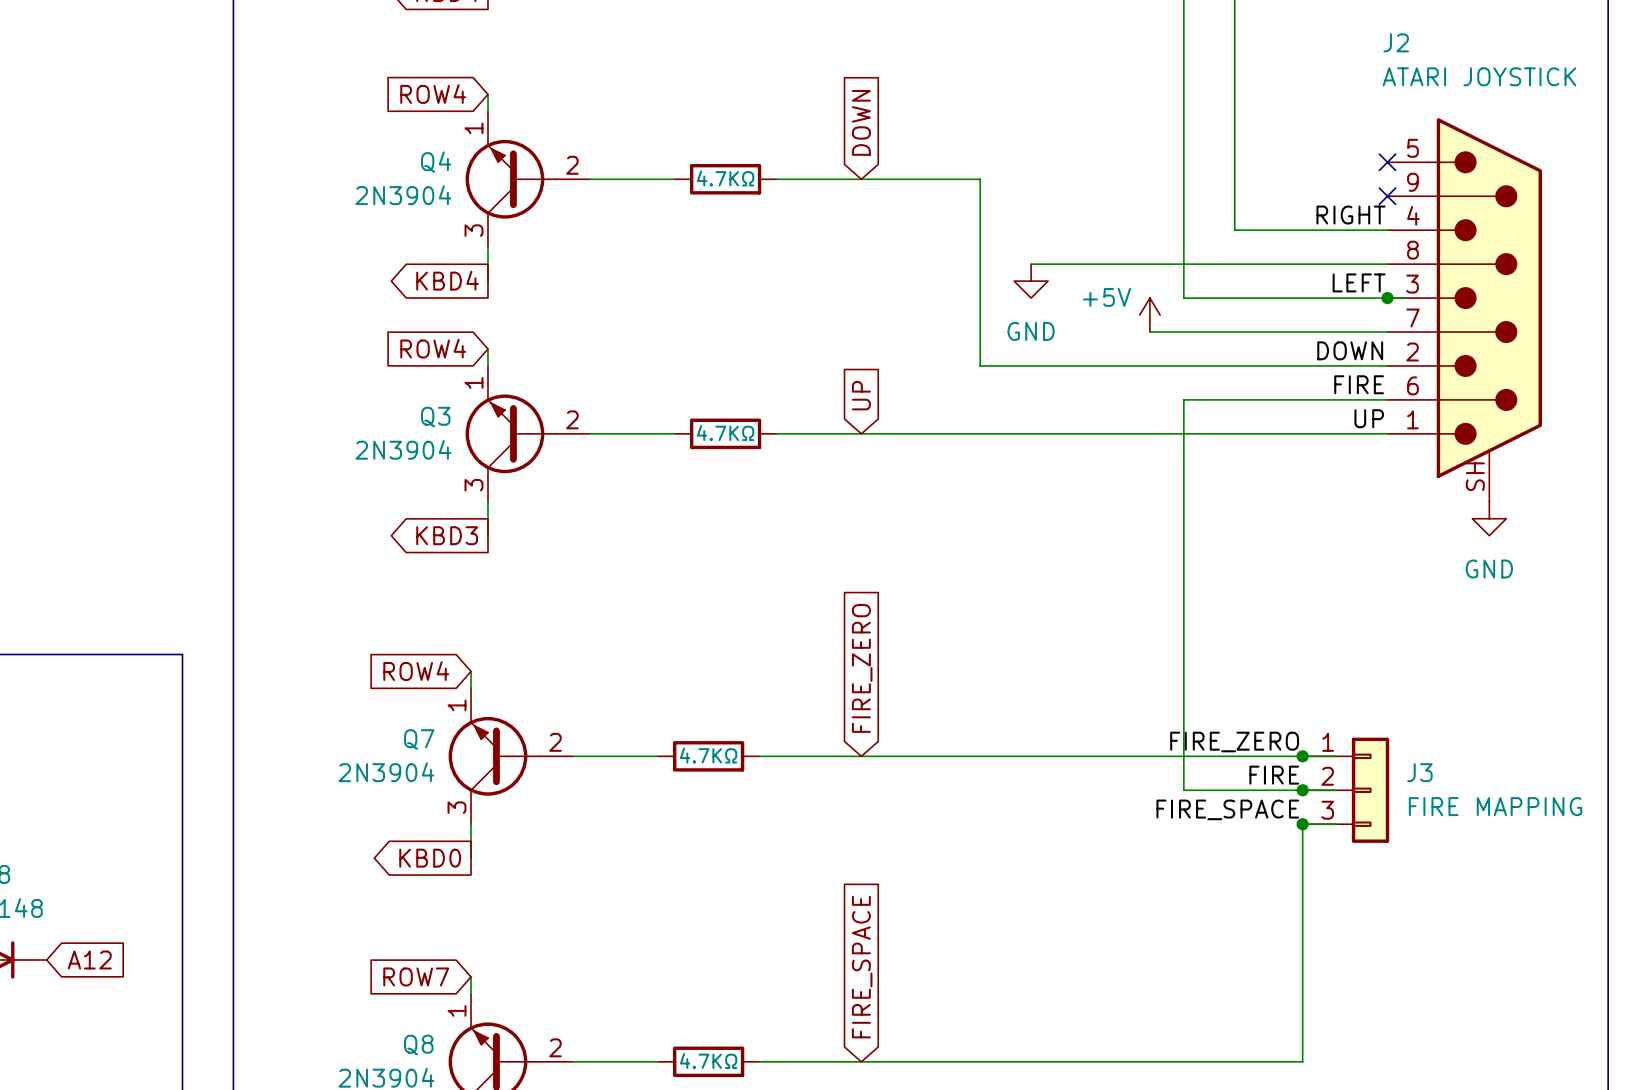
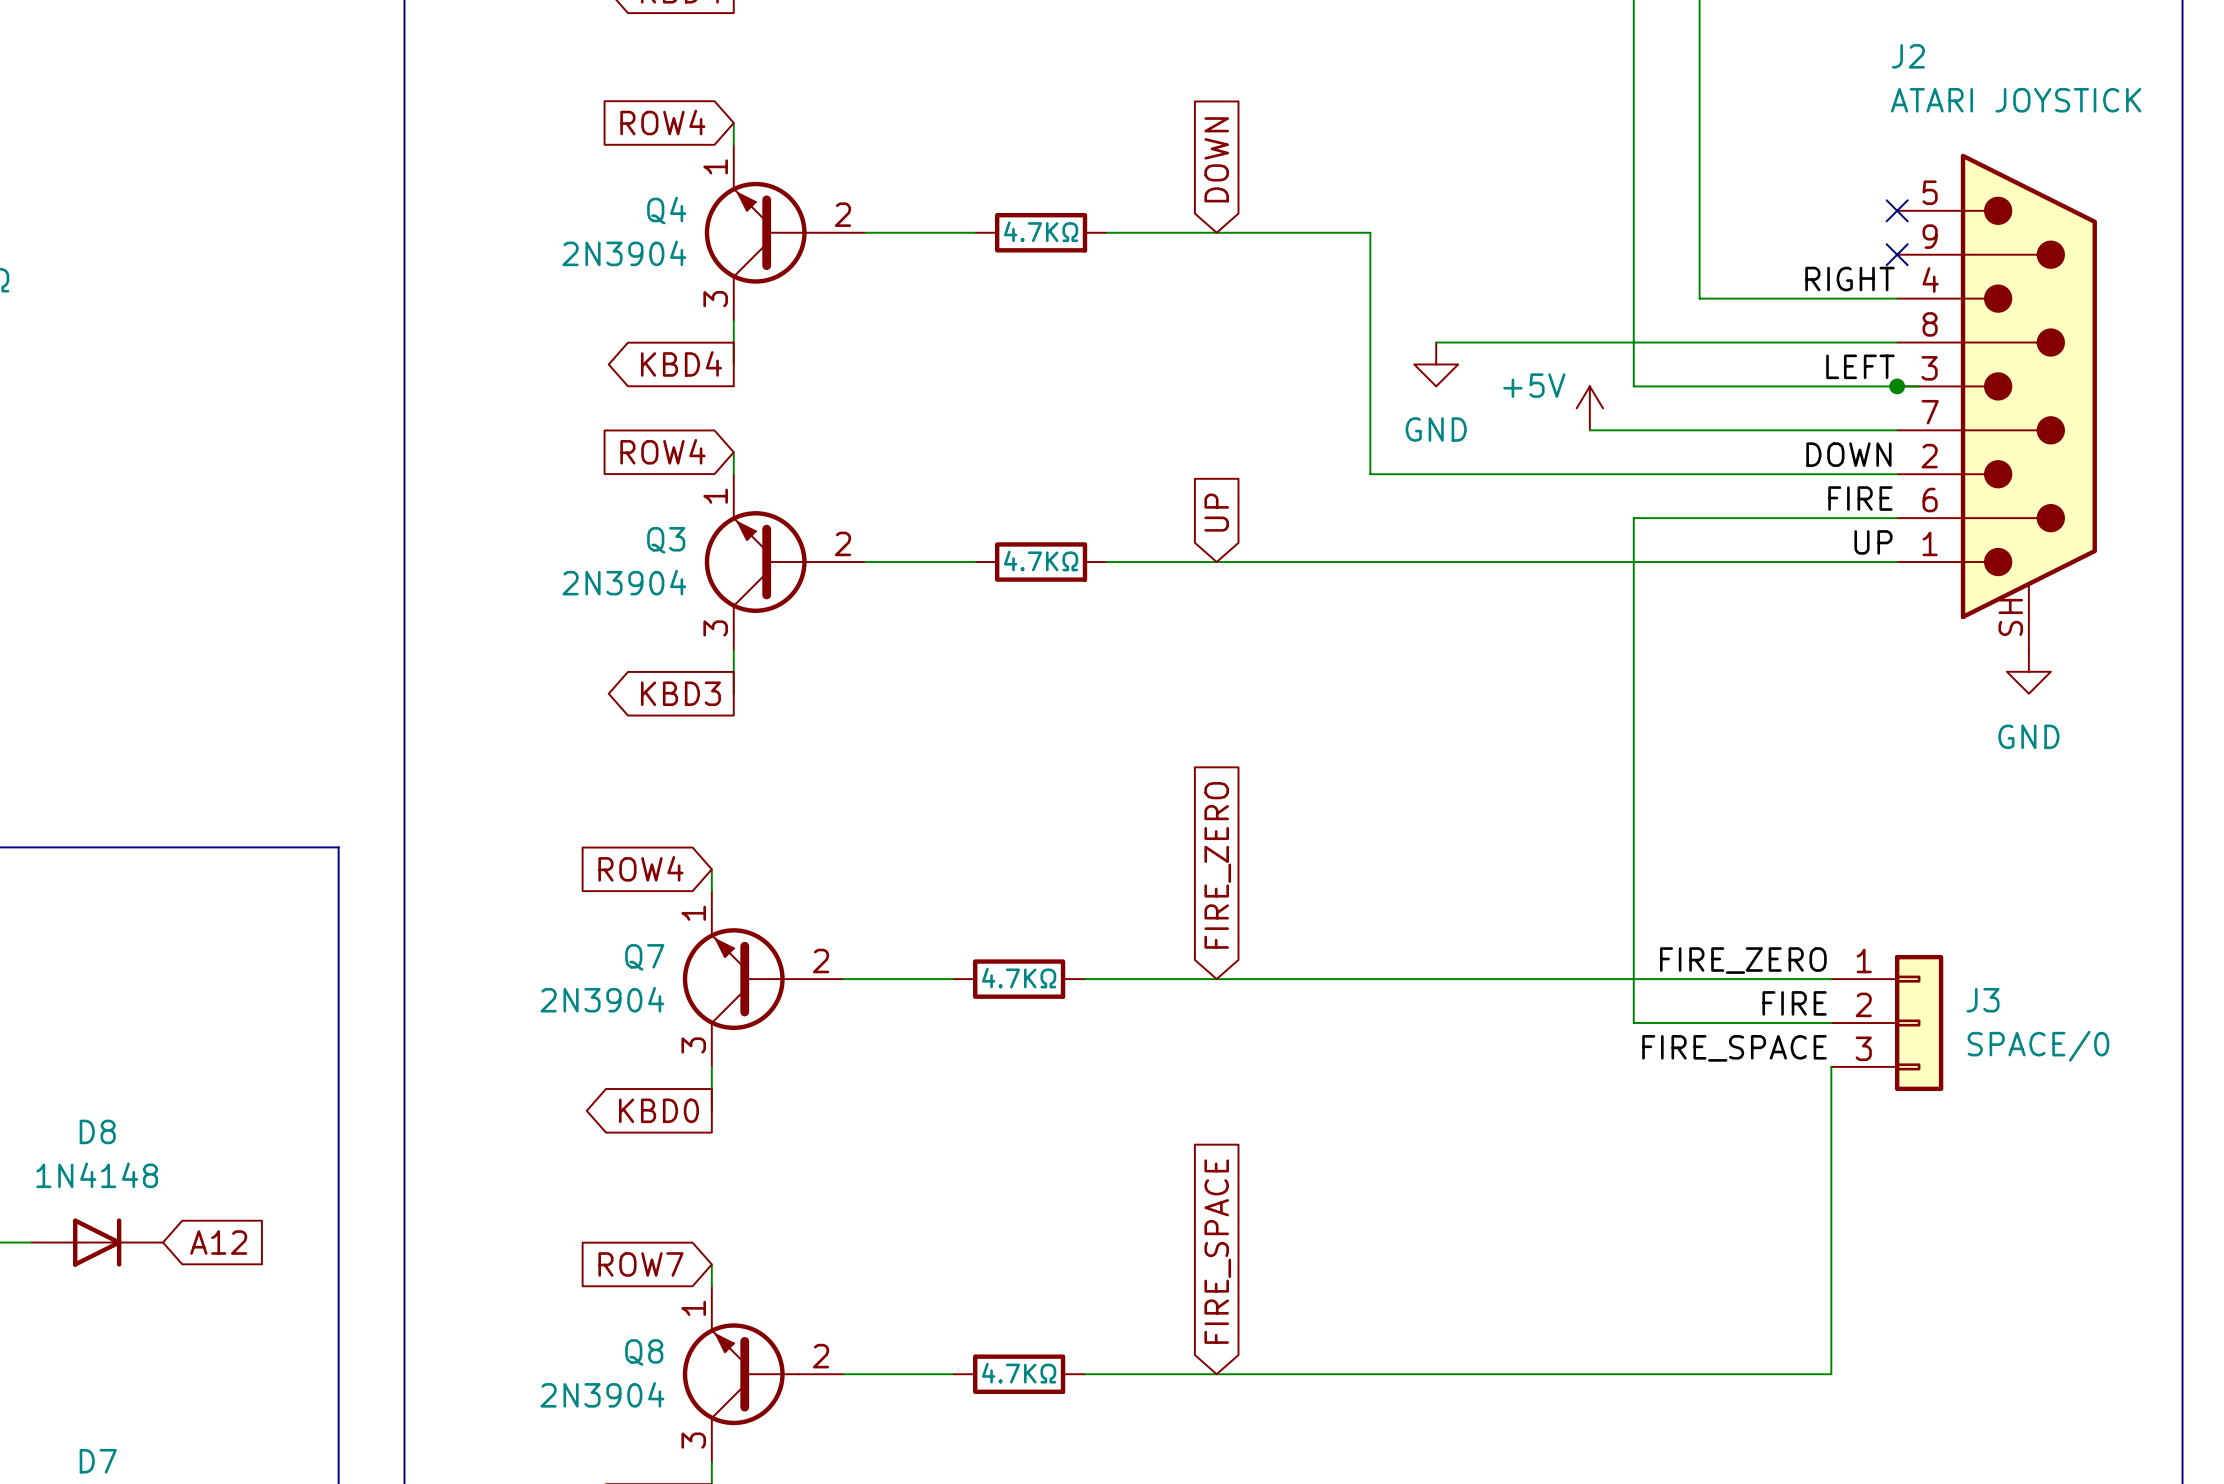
label position: FIRE_ZERO (1234, 741) -> FIRE_ZERO (1743, 960)
junction: (1302, 756) -> none
label position: FIRE (1274, 775) -> FIRE (1794, 1003)
junction: (1302, 790) -> none
J3 position: (1345, 790) -> (1887, 1023)
J3 value: FIRE MAPPING (1495, 806) -> SPACE/0 (2038, 1046)
label position: FIRE_SPACE (1227, 809) -> FIRE_SPACE (1734, 1048)
junction: (1302, 824) -> none
wire: (1336, 824) (1302, 824) (1302, 1061) -> (1831, 1066) (1831, 1374) (1787, 1374)

